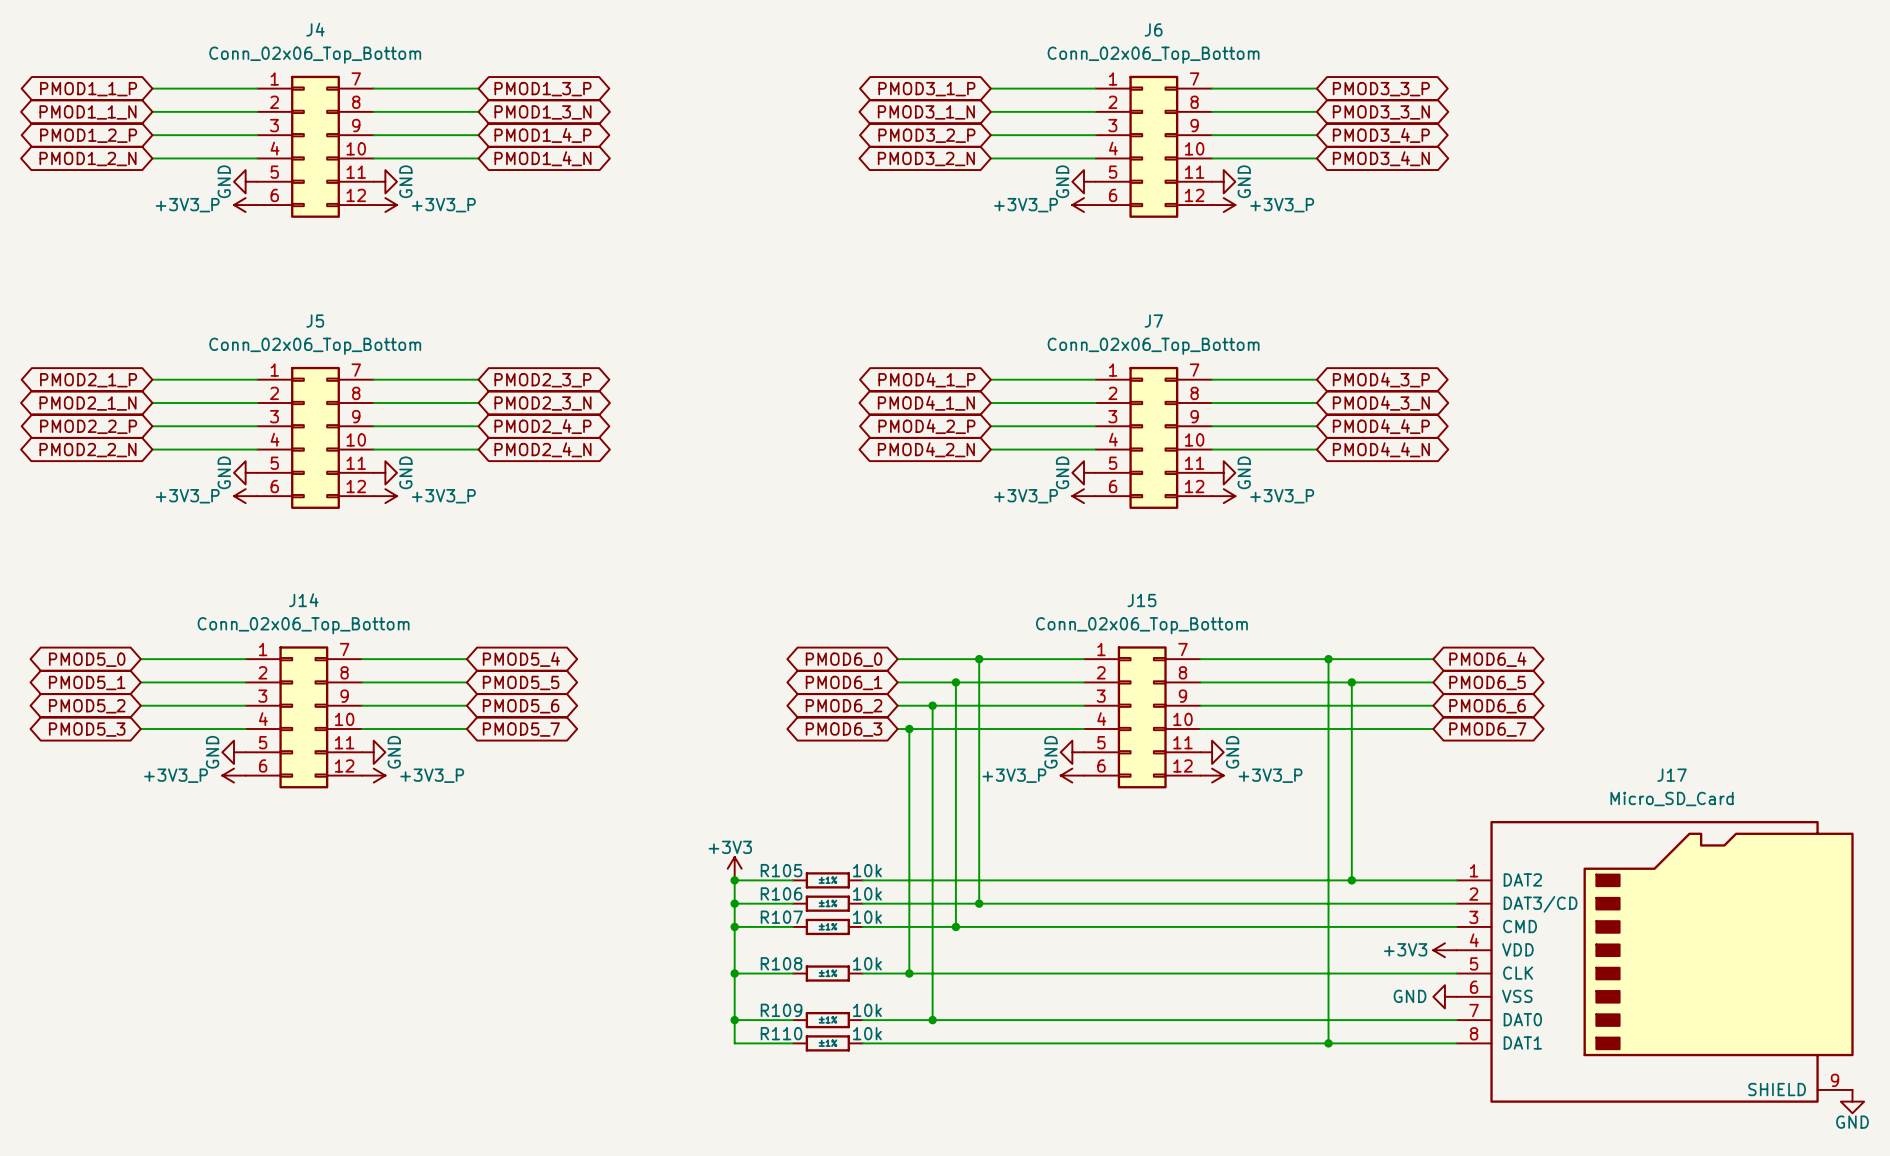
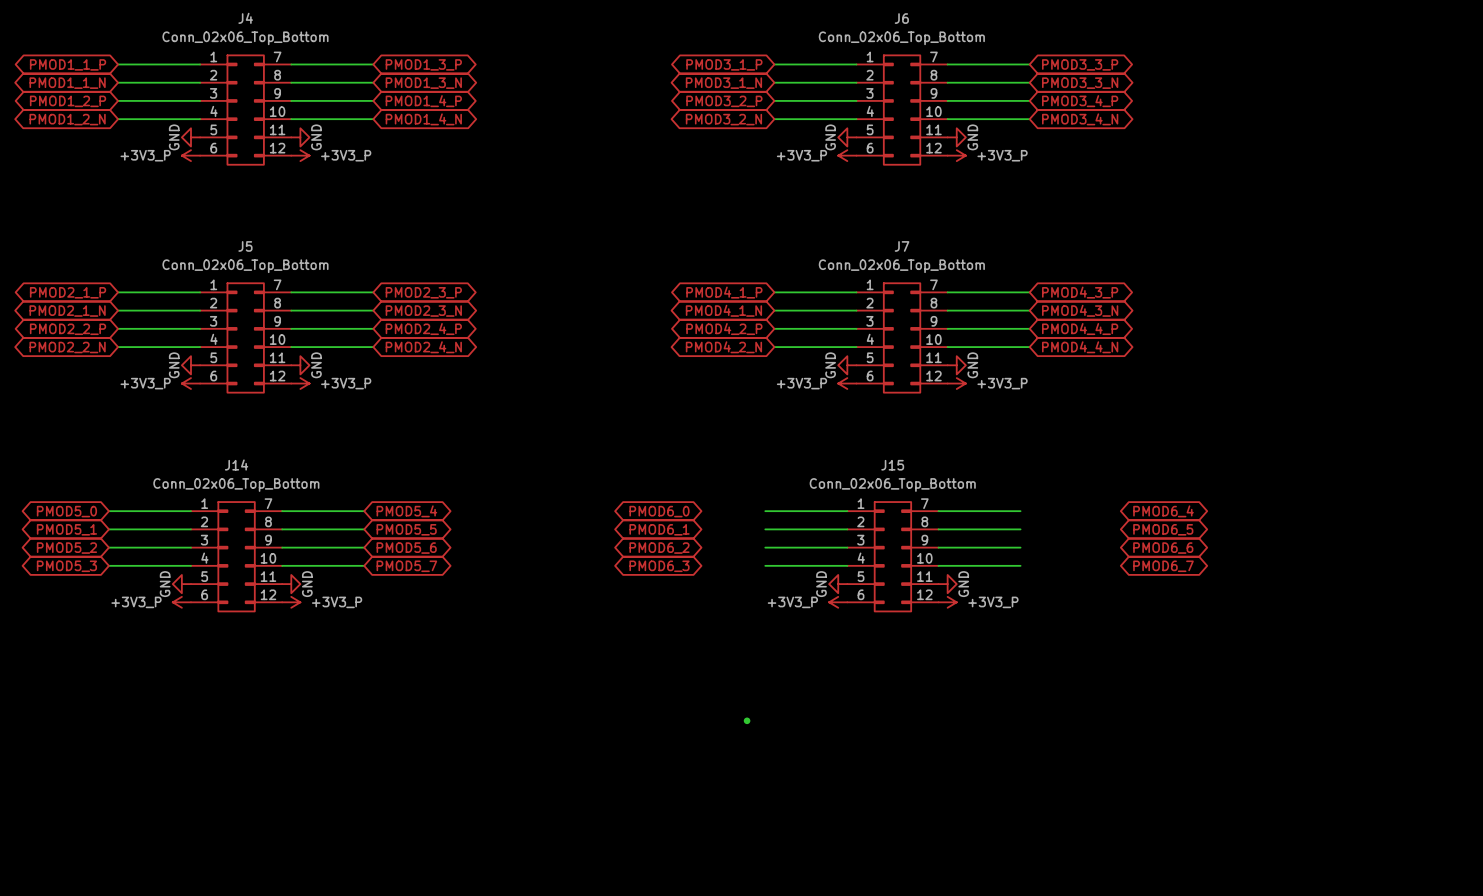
wire: (897, 659) (979, 659) (979, 903) -> none
junction: (979, 659) -> none
wire: (1305, 659) (1433, 659) -> none
wire: (1328, 659) (1328, 1043) -> none
junction: (1328, 659) -> none
wire: (897, 682) (979, 682) -> none
wire: (955, 682) (955, 926) -> none
junction: (955, 682) -> none
wire: (1305, 682) (1433, 682) -> none
wire: (1351, 682) (1351, 880) -> none
junction: (1351, 682) -> none
wire: (897, 705) (979, 705) -> none
wire: (932, 705) (932, 1020) -> none
junction: (932, 705) -> none
wire: (1305, 705) (1433, 705) -> none
wire: (897, 729) (979, 729) -> none
wire: (909, 729) (909, 973) -> none
junction: (909, 729) -> none
wire: (1305, 729) (1433, 729) -> none
power symbol: +3V3 (734, 868) -> none
junction: (734, 880) -> none
wire: (792, 880) (734, 880) (734, 1043) (792, 1043) -> none
R105: (827, 880) -> none
wire: (862, 880) (1456, 880) -> none
junction: (1351, 880) -> none
wire: (734, 903) (792, 903) -> none
junction: (734, 903) -> none
R106: (827, 903) -> none
wire: (862, 903) (1456, 903) -> none
junction: (979, 903) -> none
wire: (734, 926) (792, 926) -> none
junction: (734, 926) -> none
R107: (827, 926) -> none
wire: (862, 926) (1456, 926) -> none
power symbol: +3V3 (1444, 950) -> none
J17: Micro_SD_Card (1655, 961) -> none
wire: (734, 973) (792, 973) -> none
junction: (734, 973) -> none
R108: (827, 973) -> none
wire: (862, 973) (1456, 973) -> none
junction: (909, 973) -> none
power symbol: GND (1444, 996) -> none
wire: (734, 1020) (792, 1020) -> none
junction: (734, 1020) -> none
R109: (827, 1020) -> none
wire: (862, 1020) (1456, 1020) -> none
junction: (932, 1020) -> none
R110: (827, 1043) -> none
wire: (862, 1043) (1456, 1043) -> none
junction: (1328, 1043) -> none
power symbol: GND (1852, 1101) -> none

